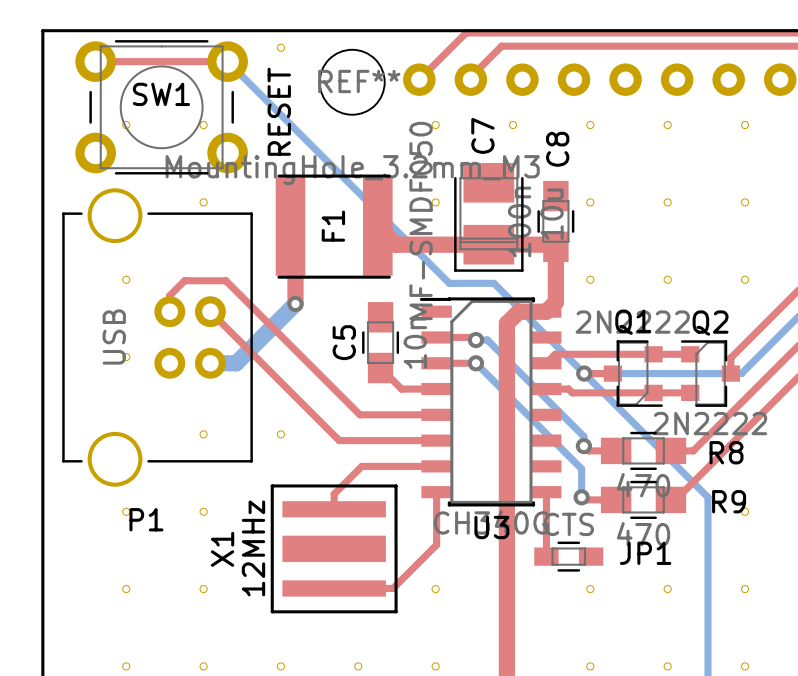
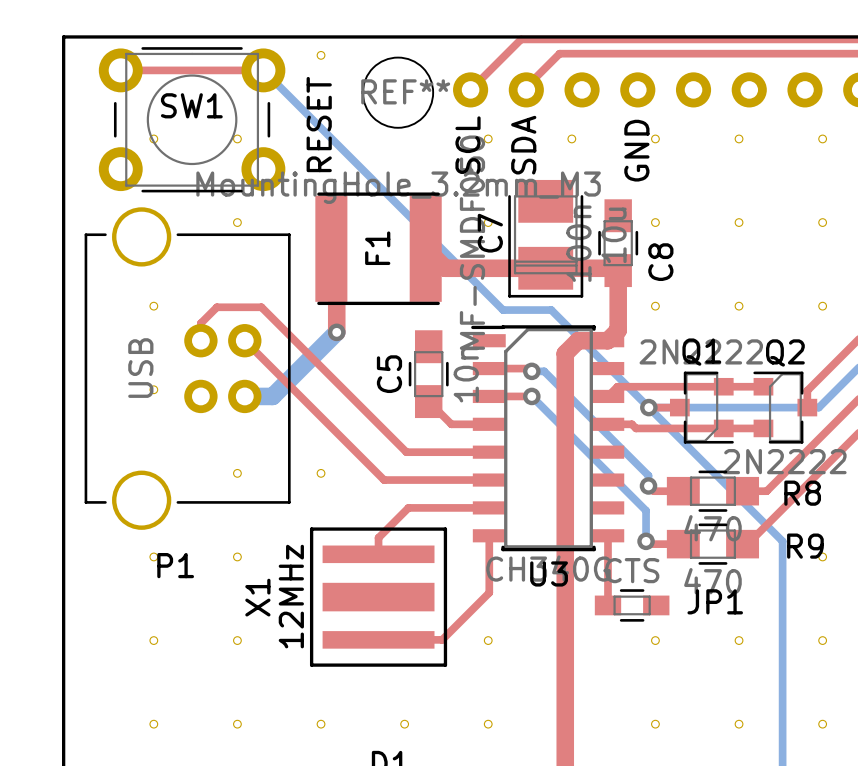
text: none -> SCL (468, 145)
text: none -> SDA (523, 145)
C7 name position: C7 (482, 135) -> C7 (490, 233)
text: none -> GND (636, 150)
C8 name position: C8 (557, 149) -> C8 (660, 262)

